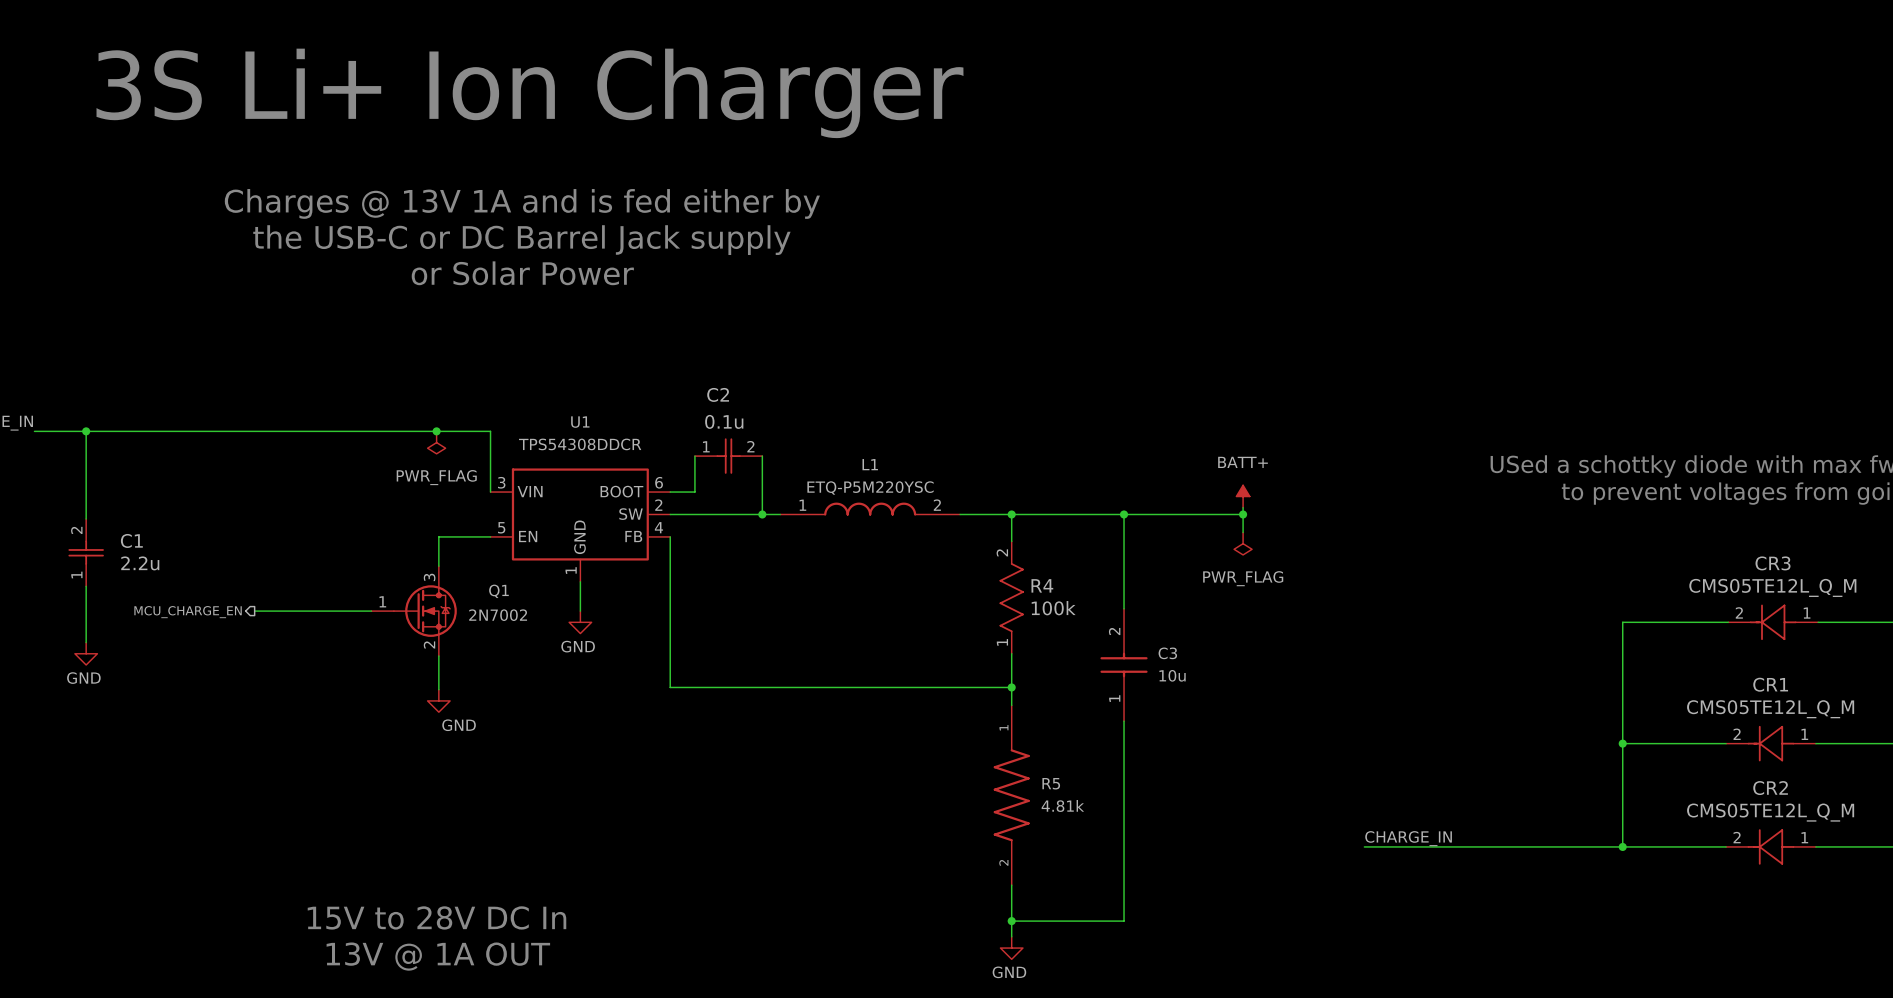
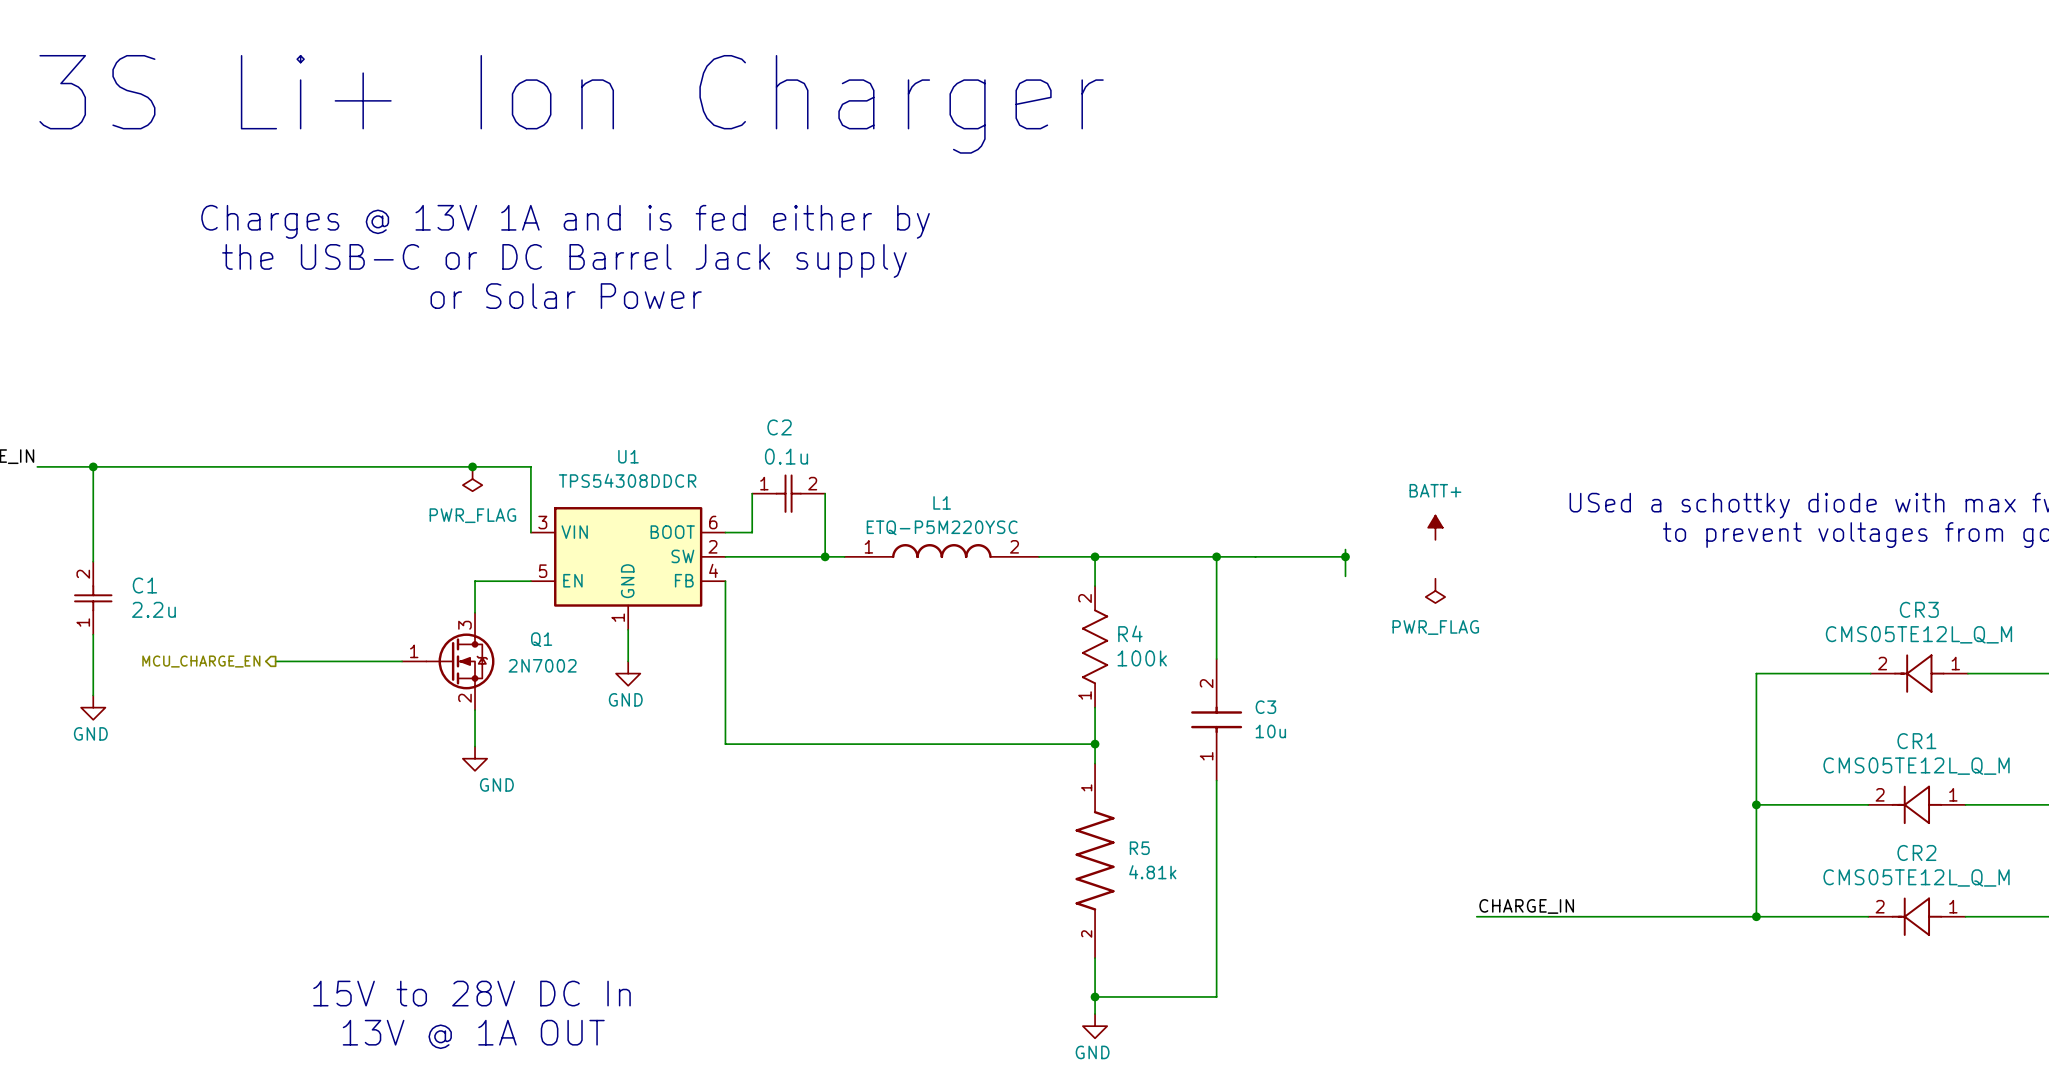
power symbol position: BATT+ (1243, 496) -> BATT+ (1435, 527)
power symbol position: PWR_FLAG (1243, 543) -> PWR_FLAG (1435, 590)

